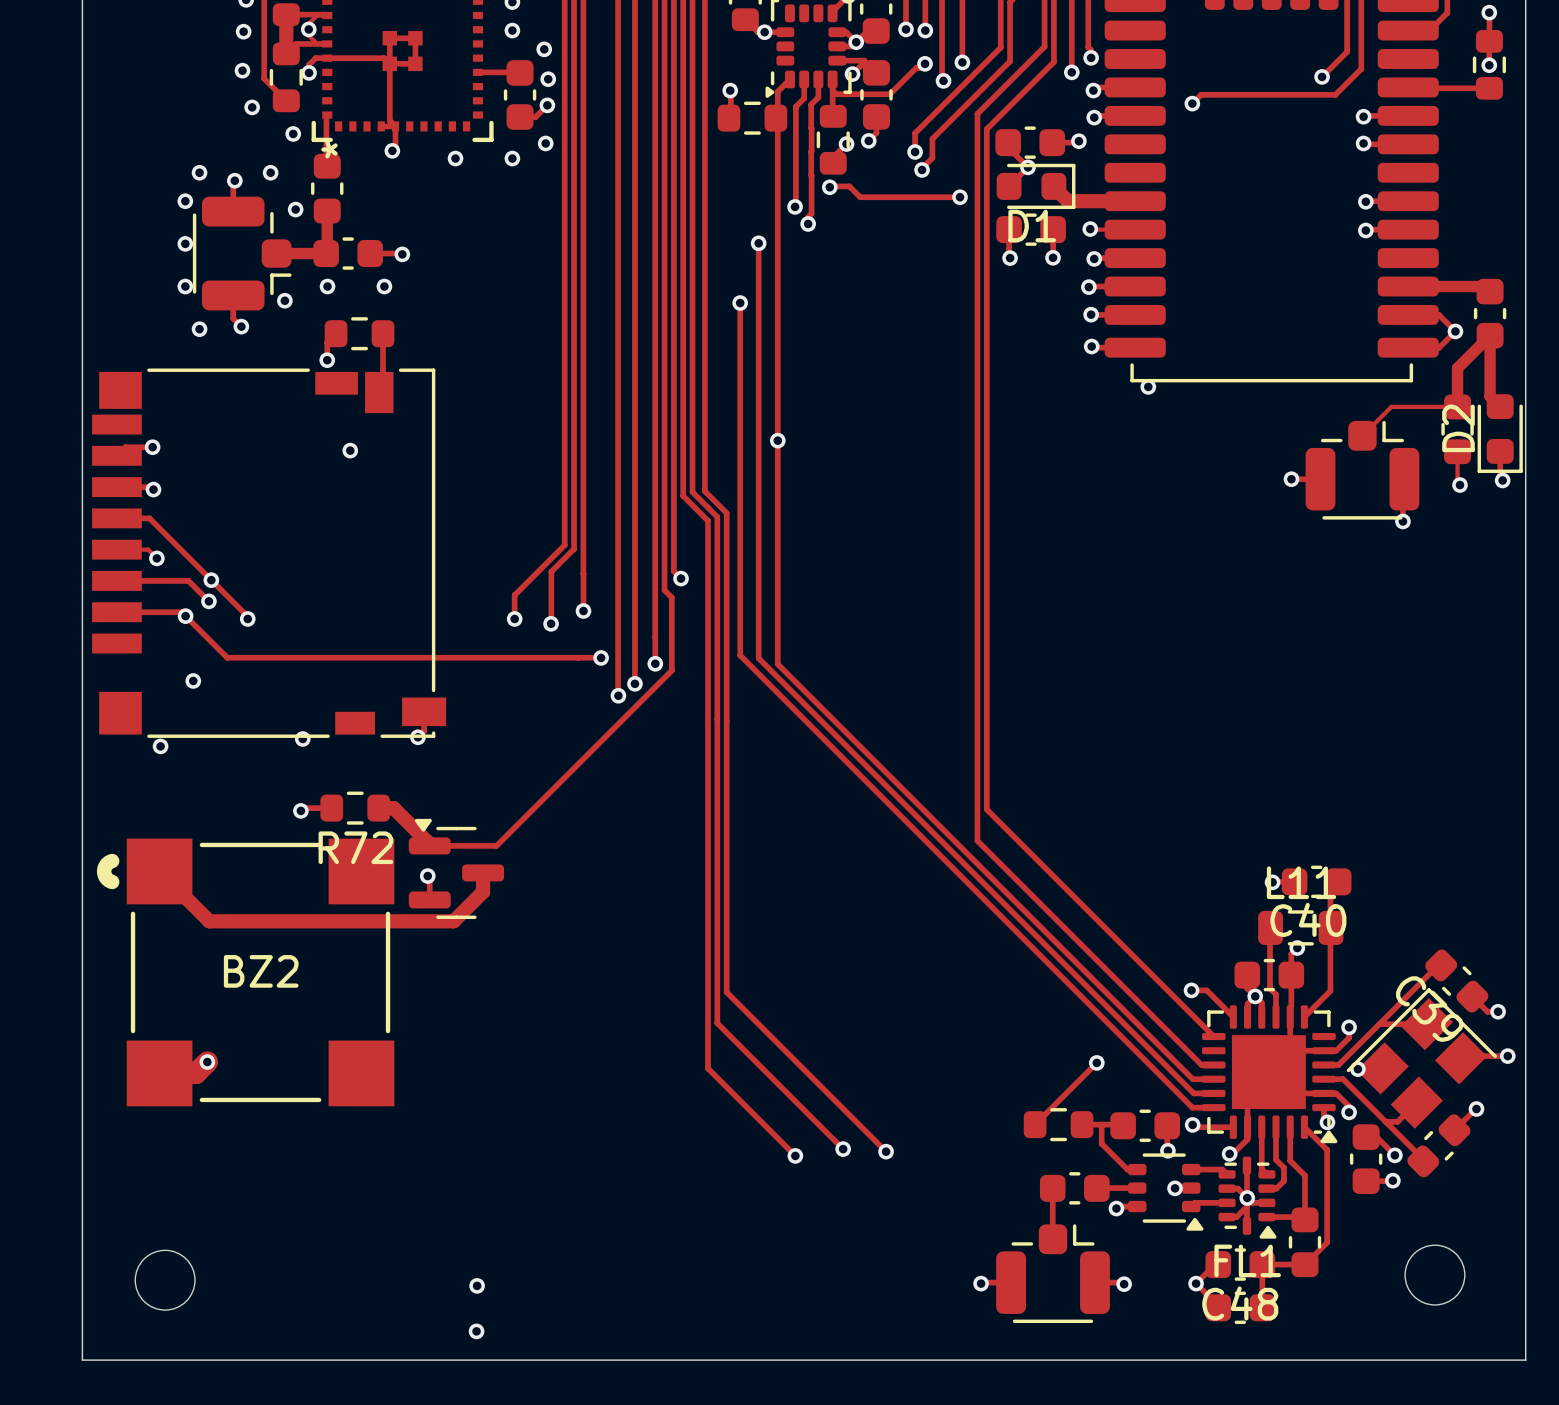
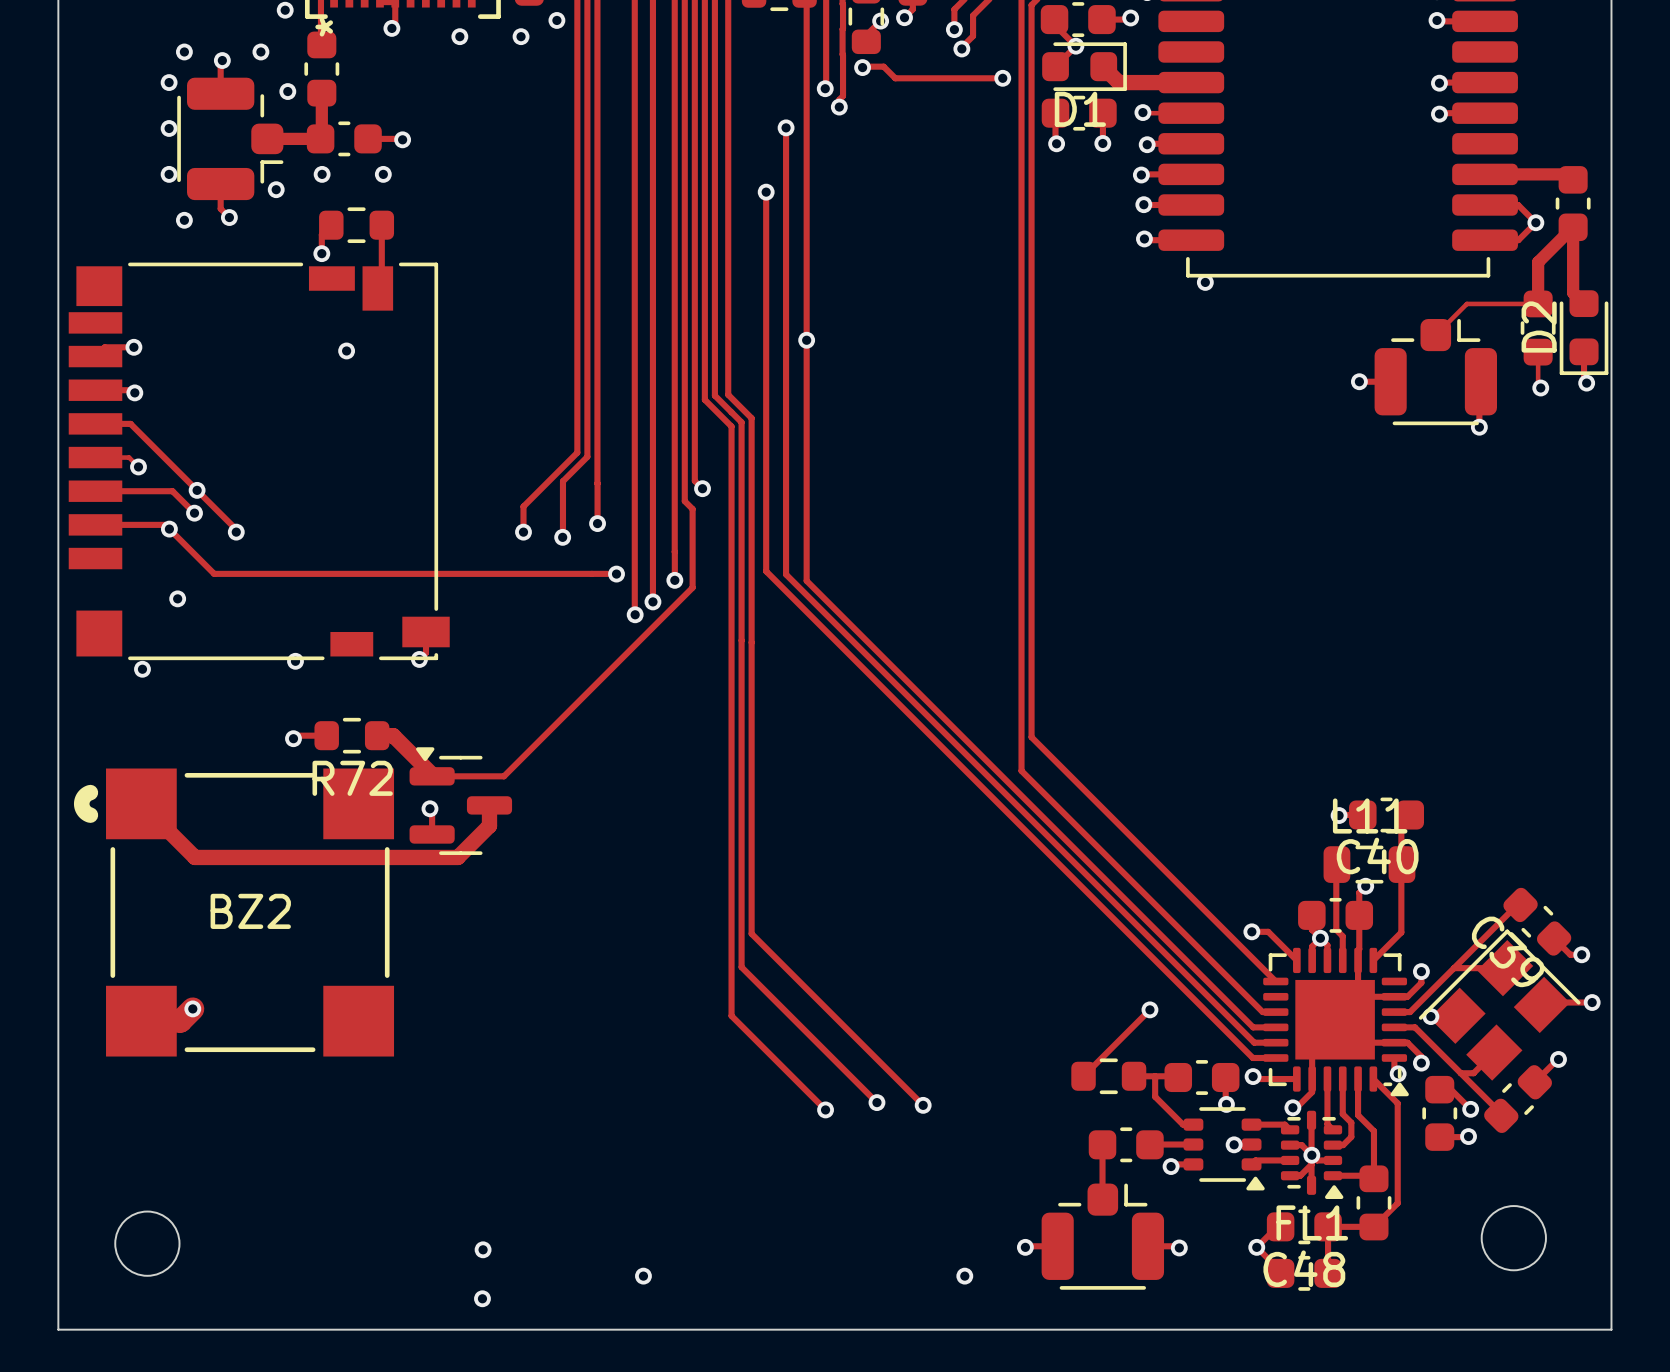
via: none -> (643, 1276)
via: none -> (964, 1276)

